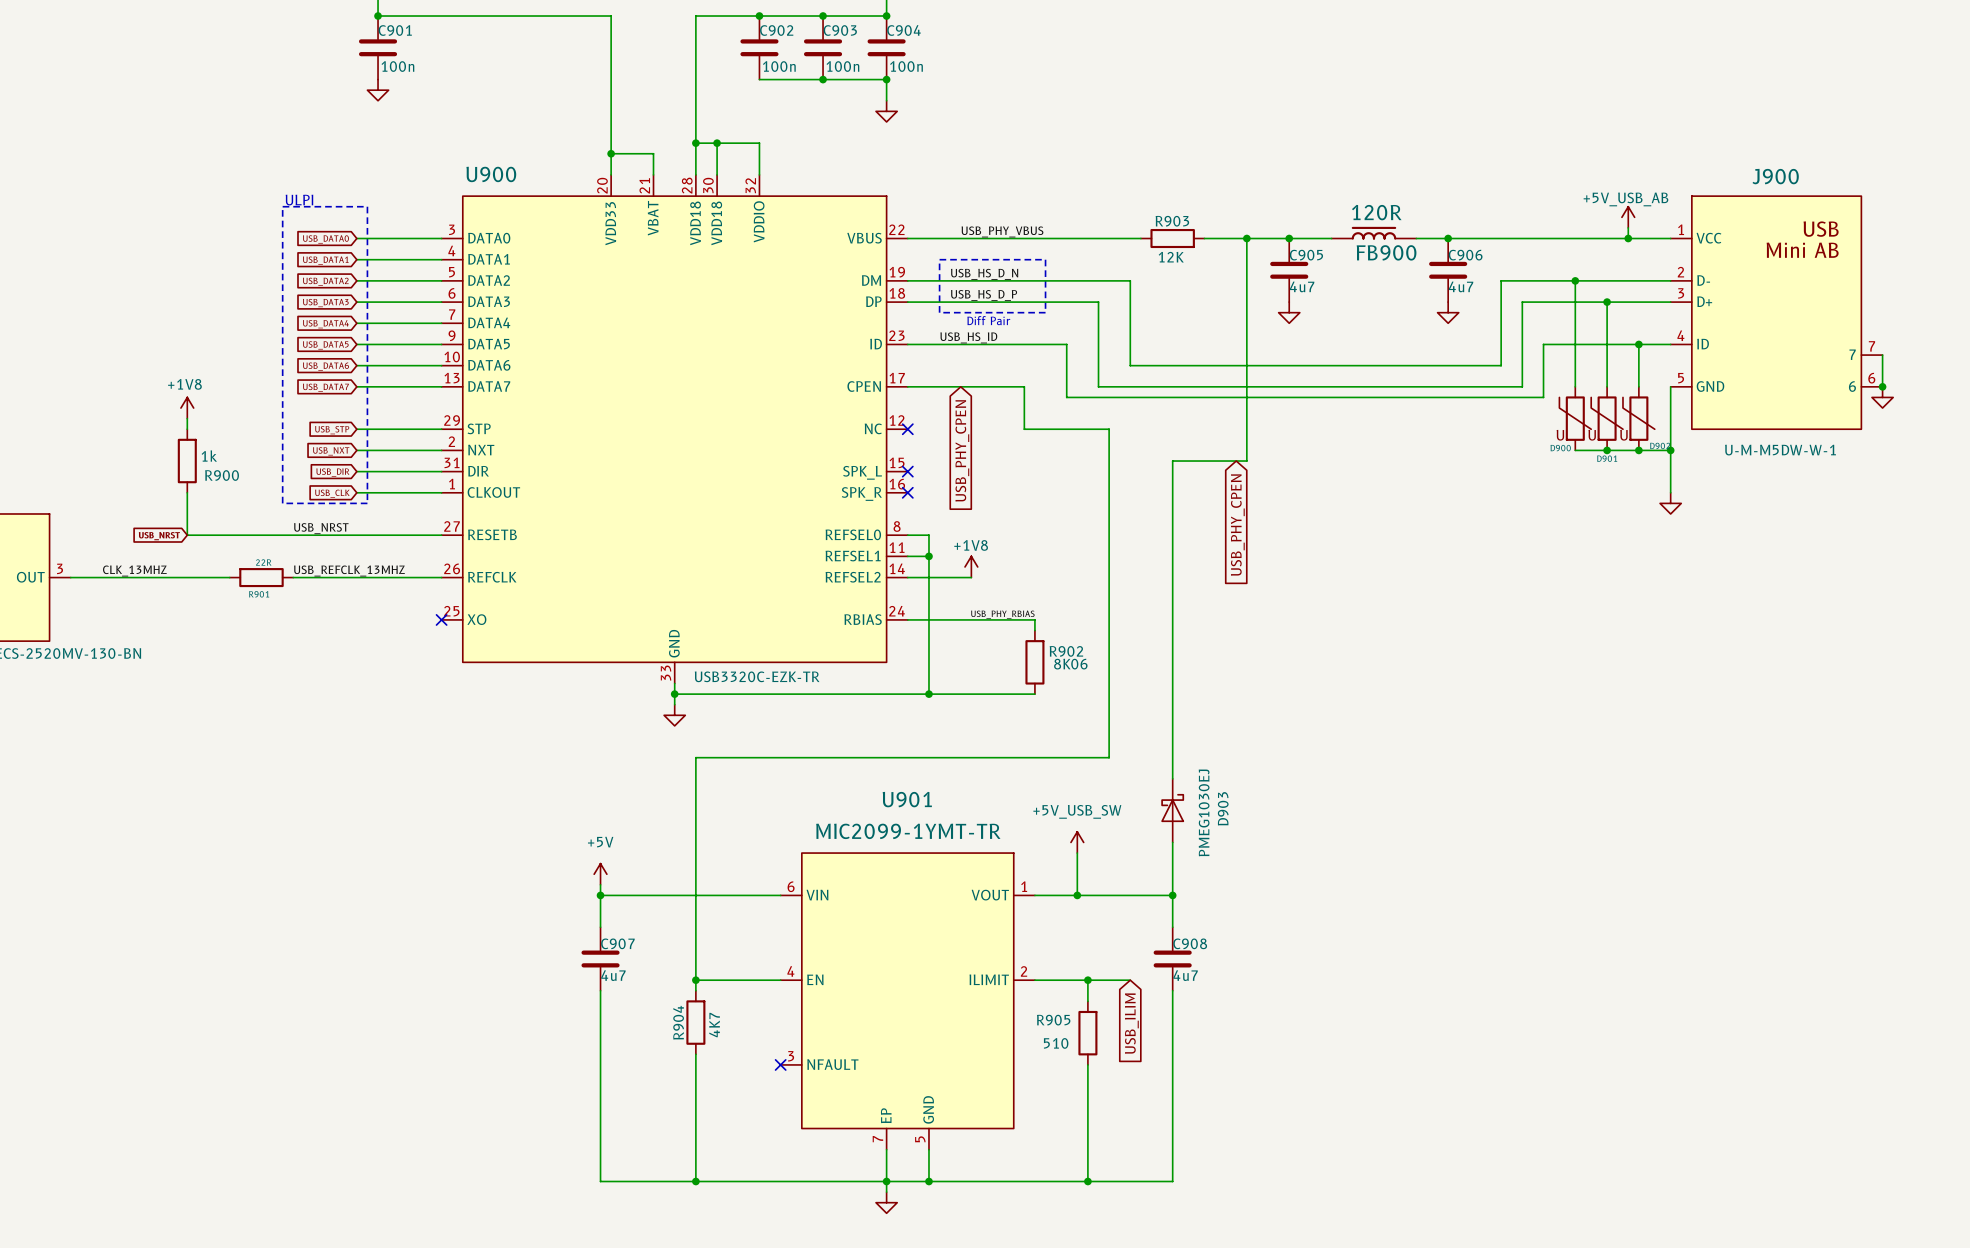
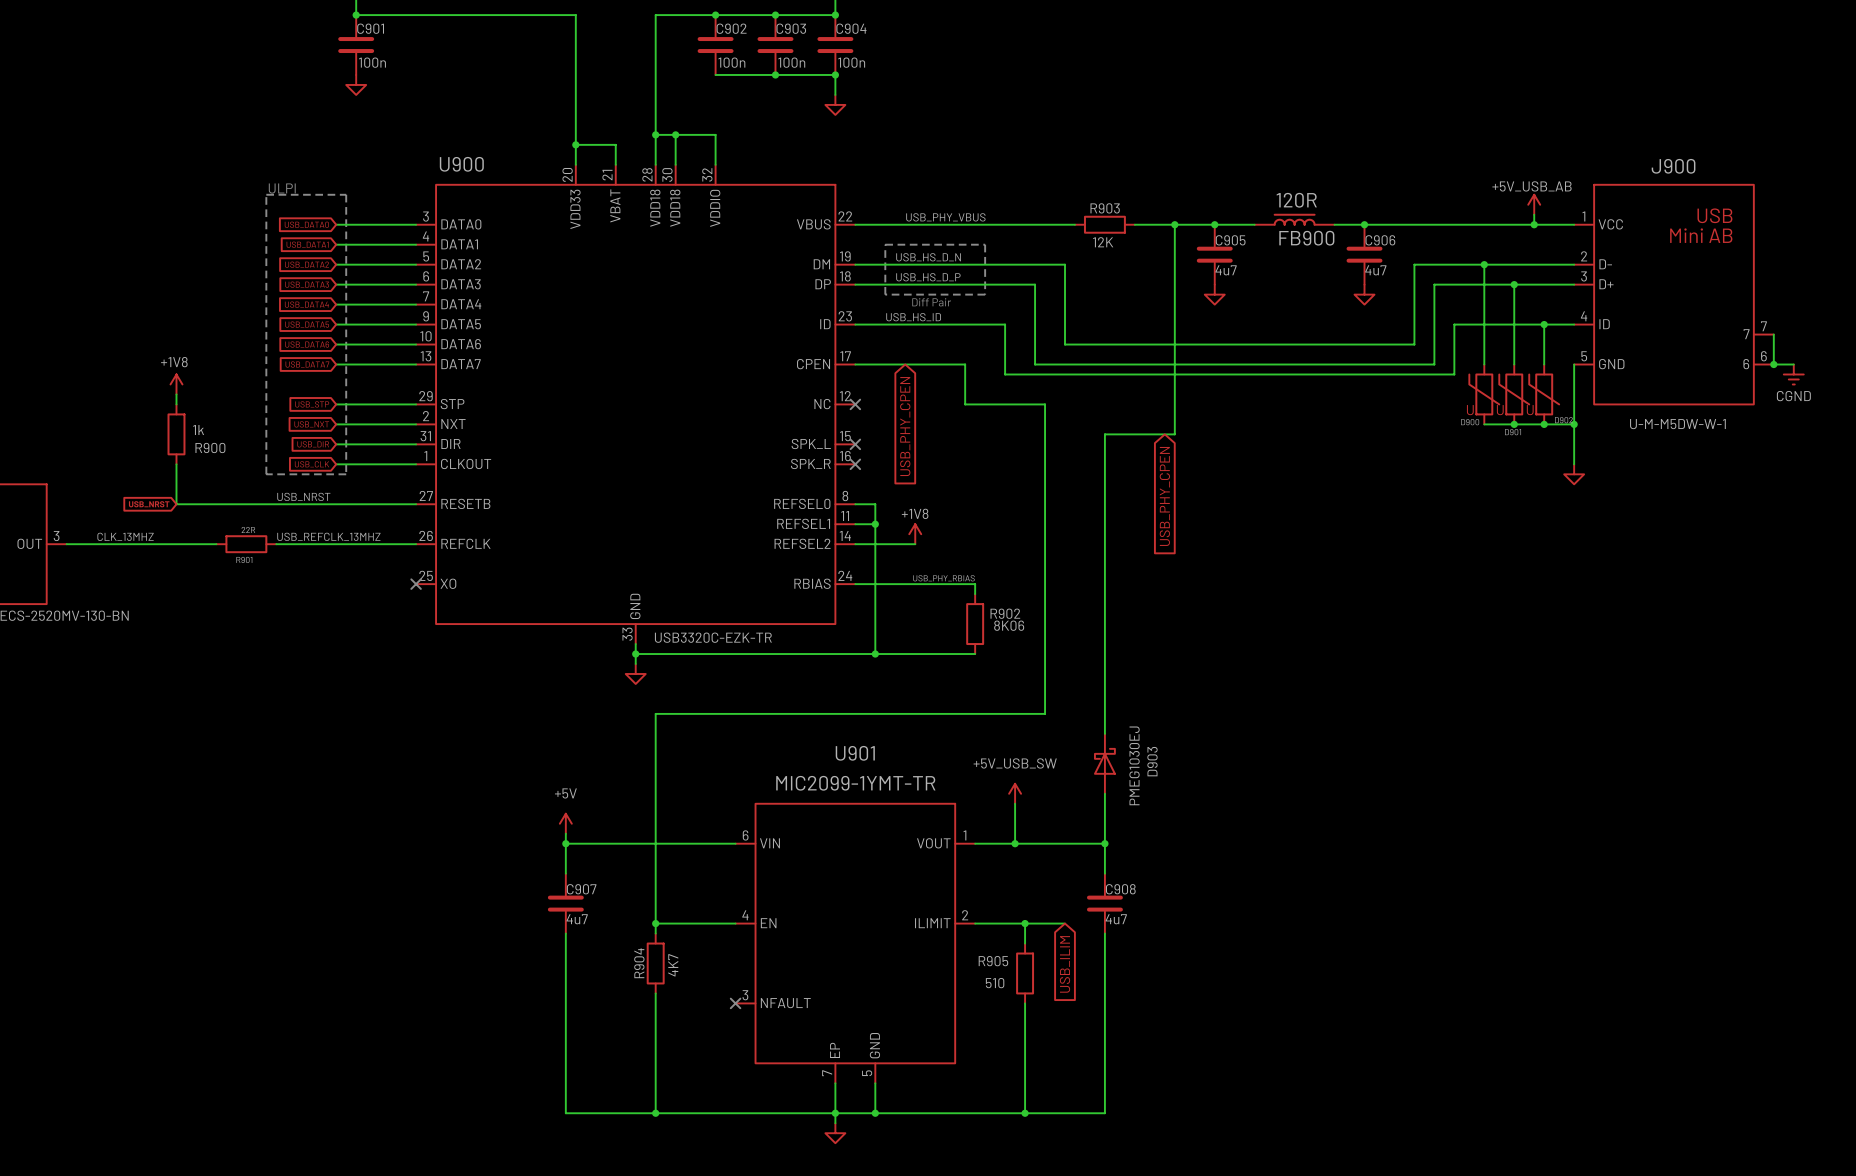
wire: none -> (1773, 364) (1793, 364)
power symbol: (1882, 397) -> none
power symbol: none -> CGND (1793, 374)

